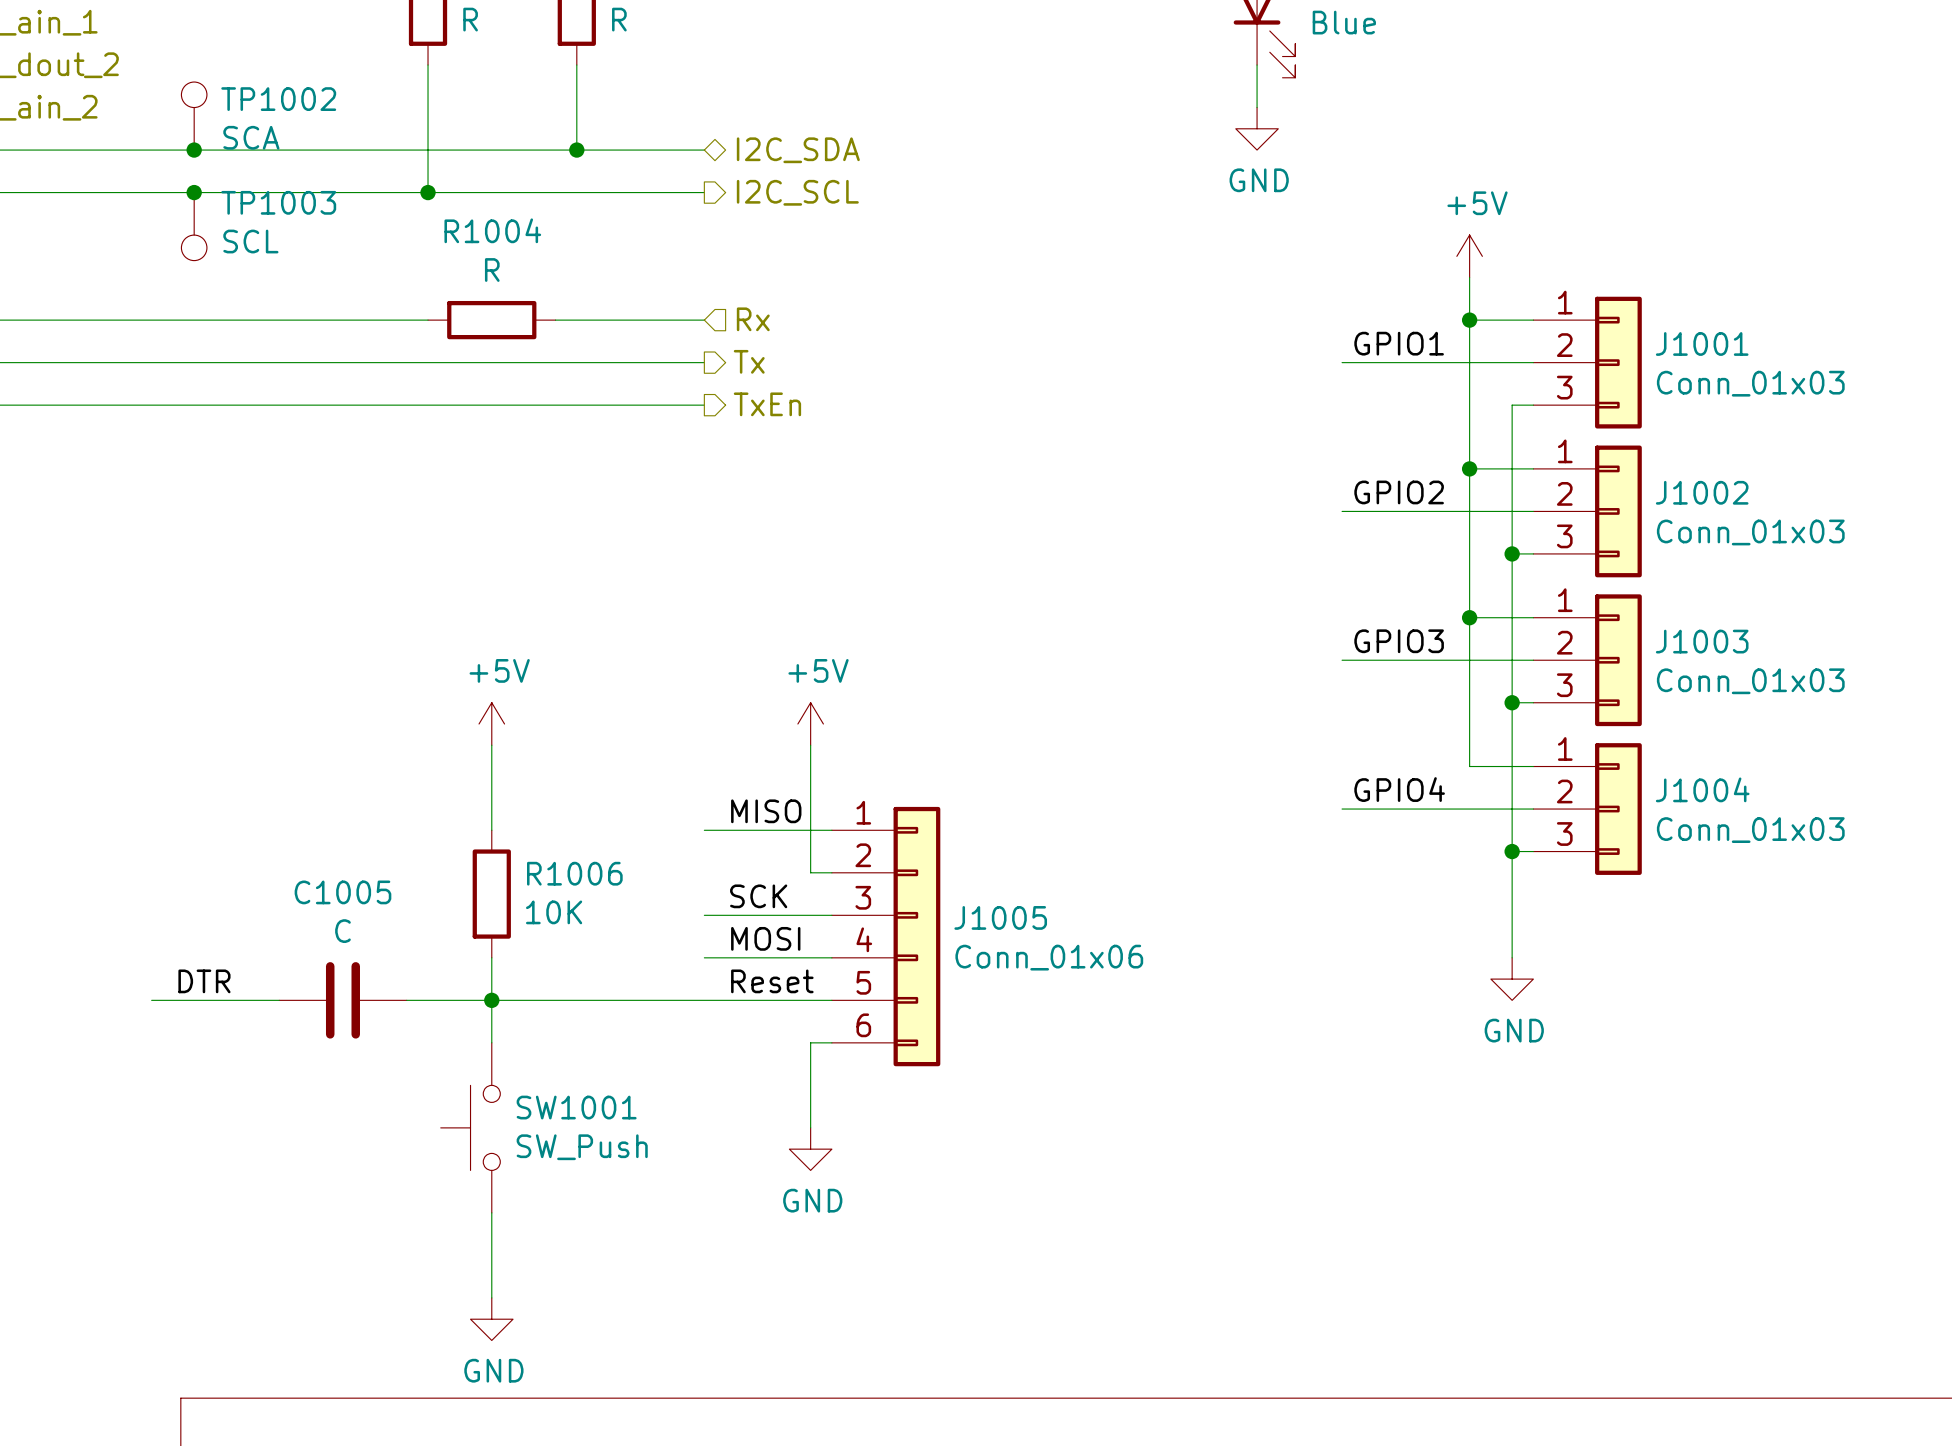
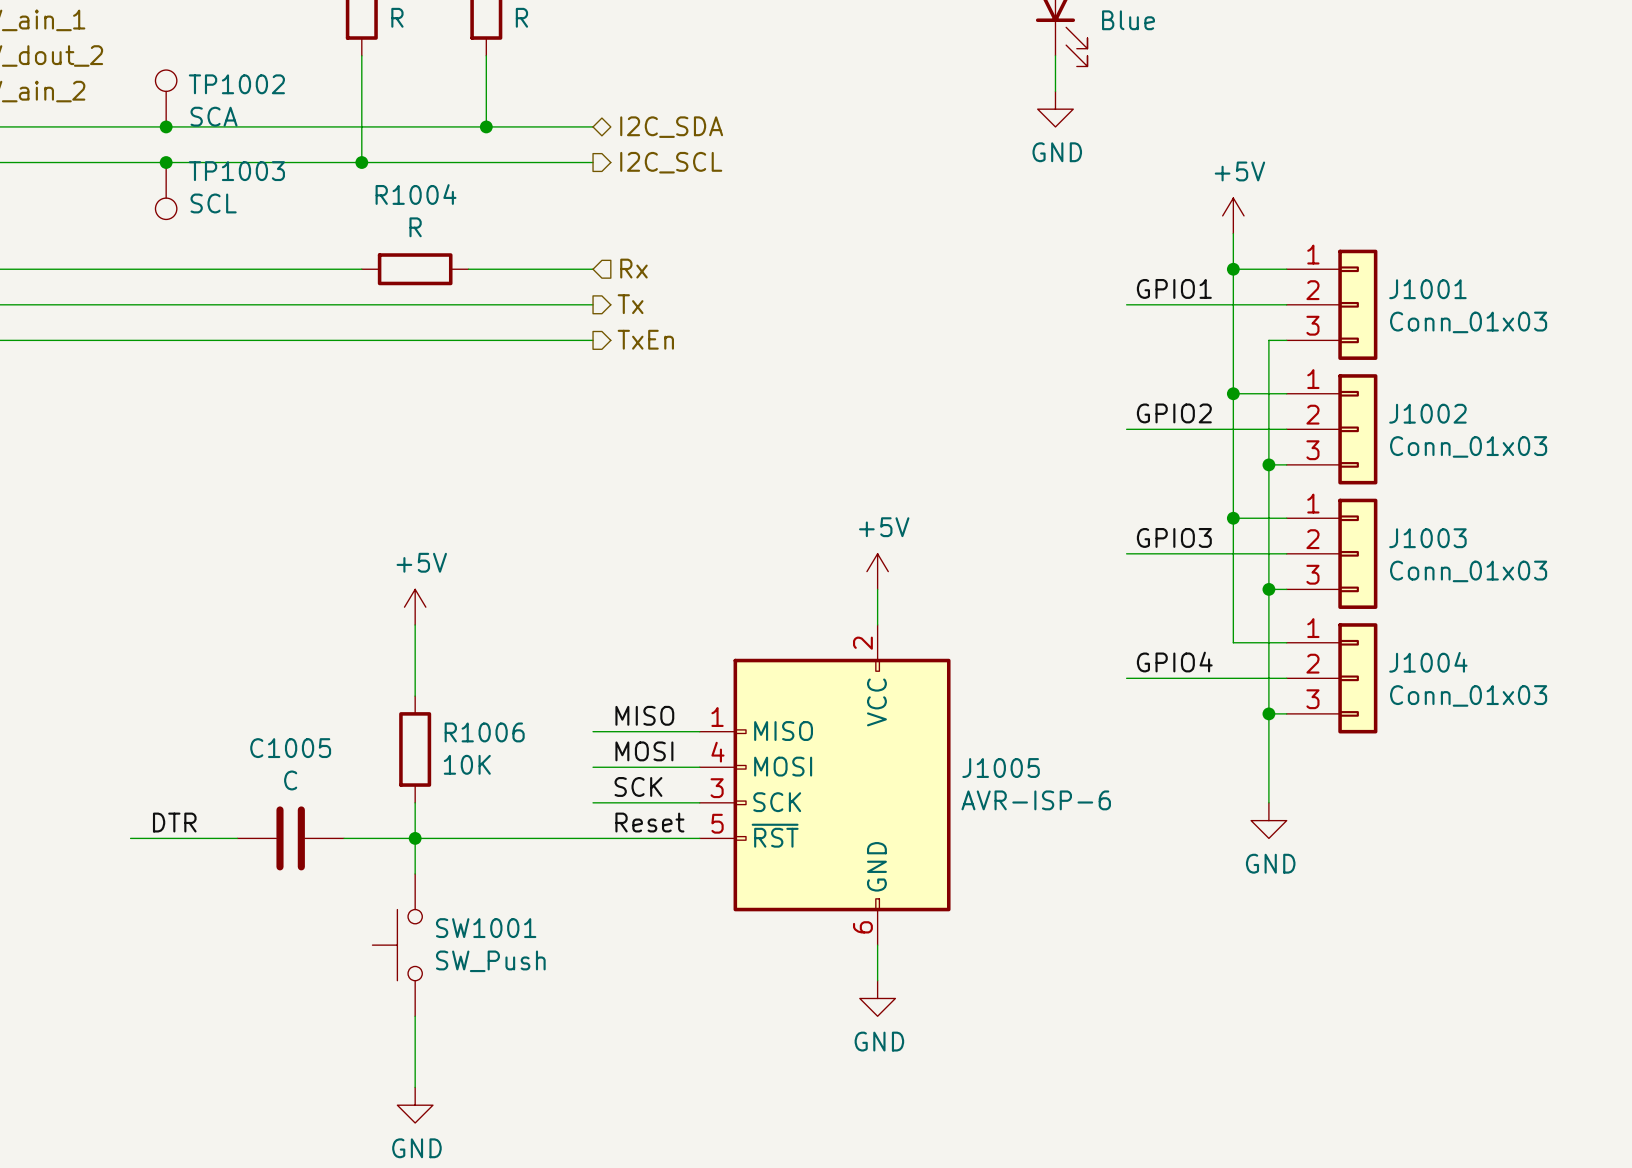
wire: none -> (877, 589) (877, 624)
power symbol position: +5V (810, 724) -> +5V (877, 571)
wire: (810, 745) (810, 872) -> (593, 731) (681, 731)
J1005 symbol: [831, 806, 941, 1067] -> [699, 624, 951, 946]
label position: MISO (766, 811) -> MISO (644, 715)
wire: (704, 830) (831, 830) -> none
label: SCK (758, 896) -> MOSI (644, 751)
J1005 name position: J1005 (1000, 917) -> J1005 (1001, 768)
label: MOSI (765, 938) -> SCK (638, 786)
J1005 value: Conn_01x06 (1049, 957) -> AVR-ISP-6 (1036, 800)
wire: (831, 1042) (810, 1042) (810, 1127) -> none
wire: none -> (877, 945) (877, 980)
power symbol position: GND (810, 1149) -> GND (877, 998)

